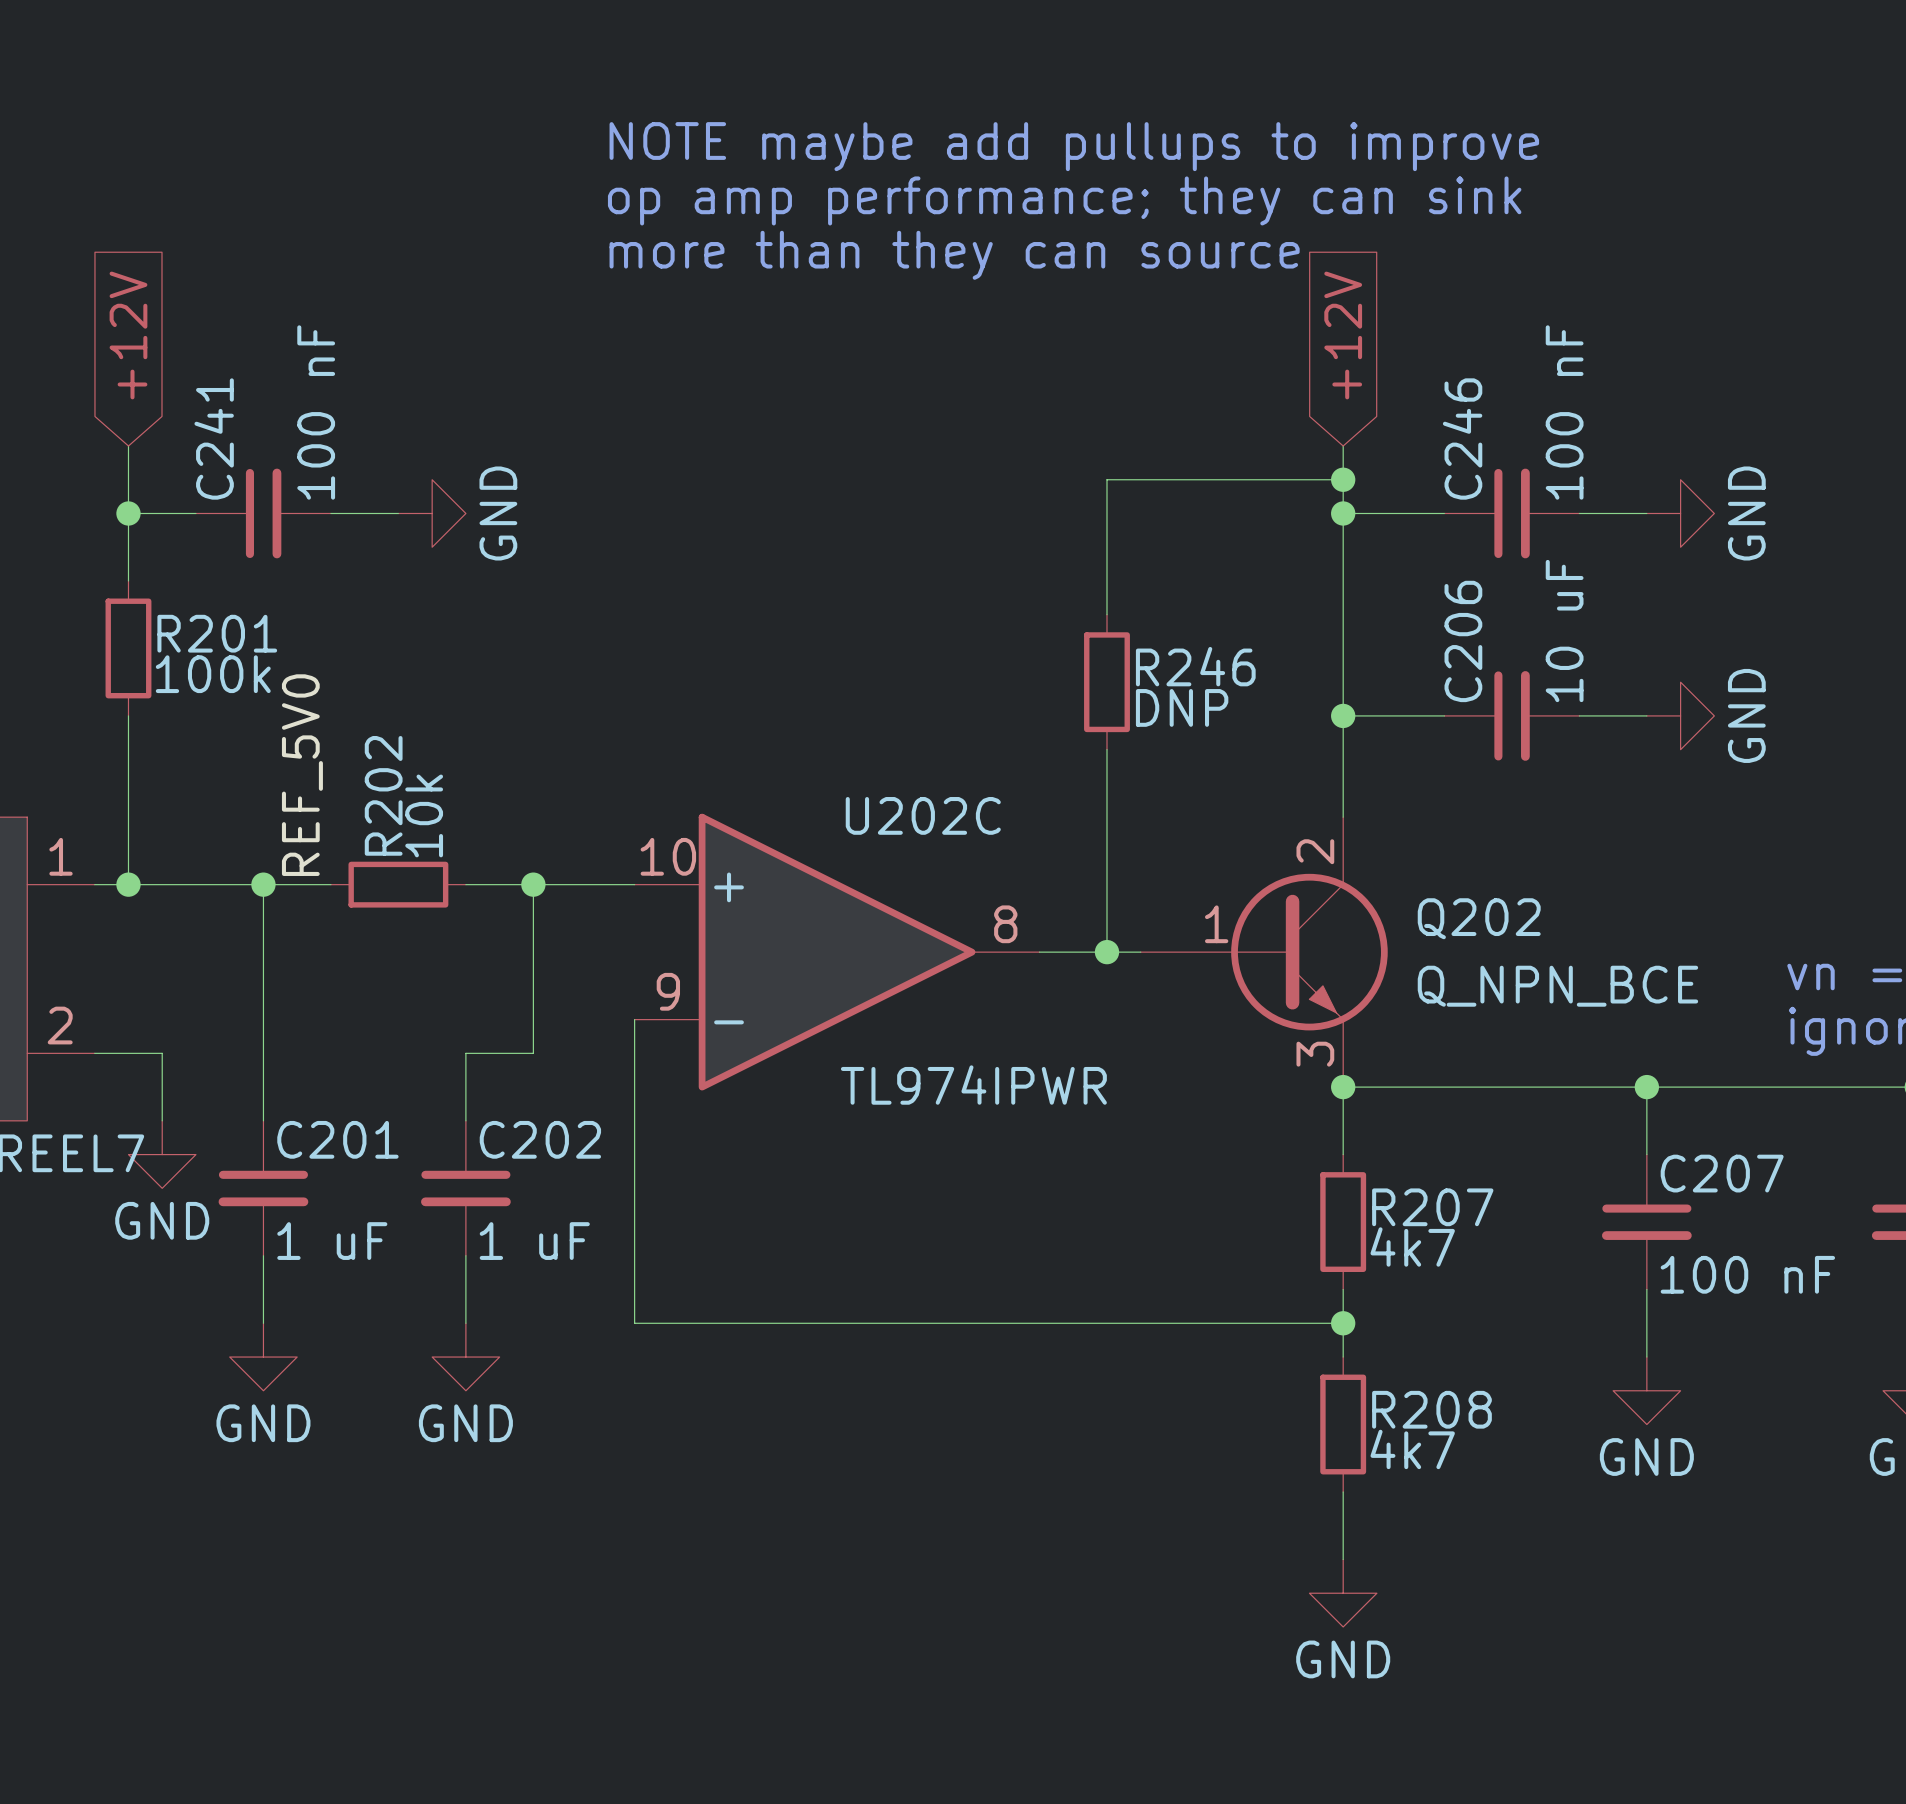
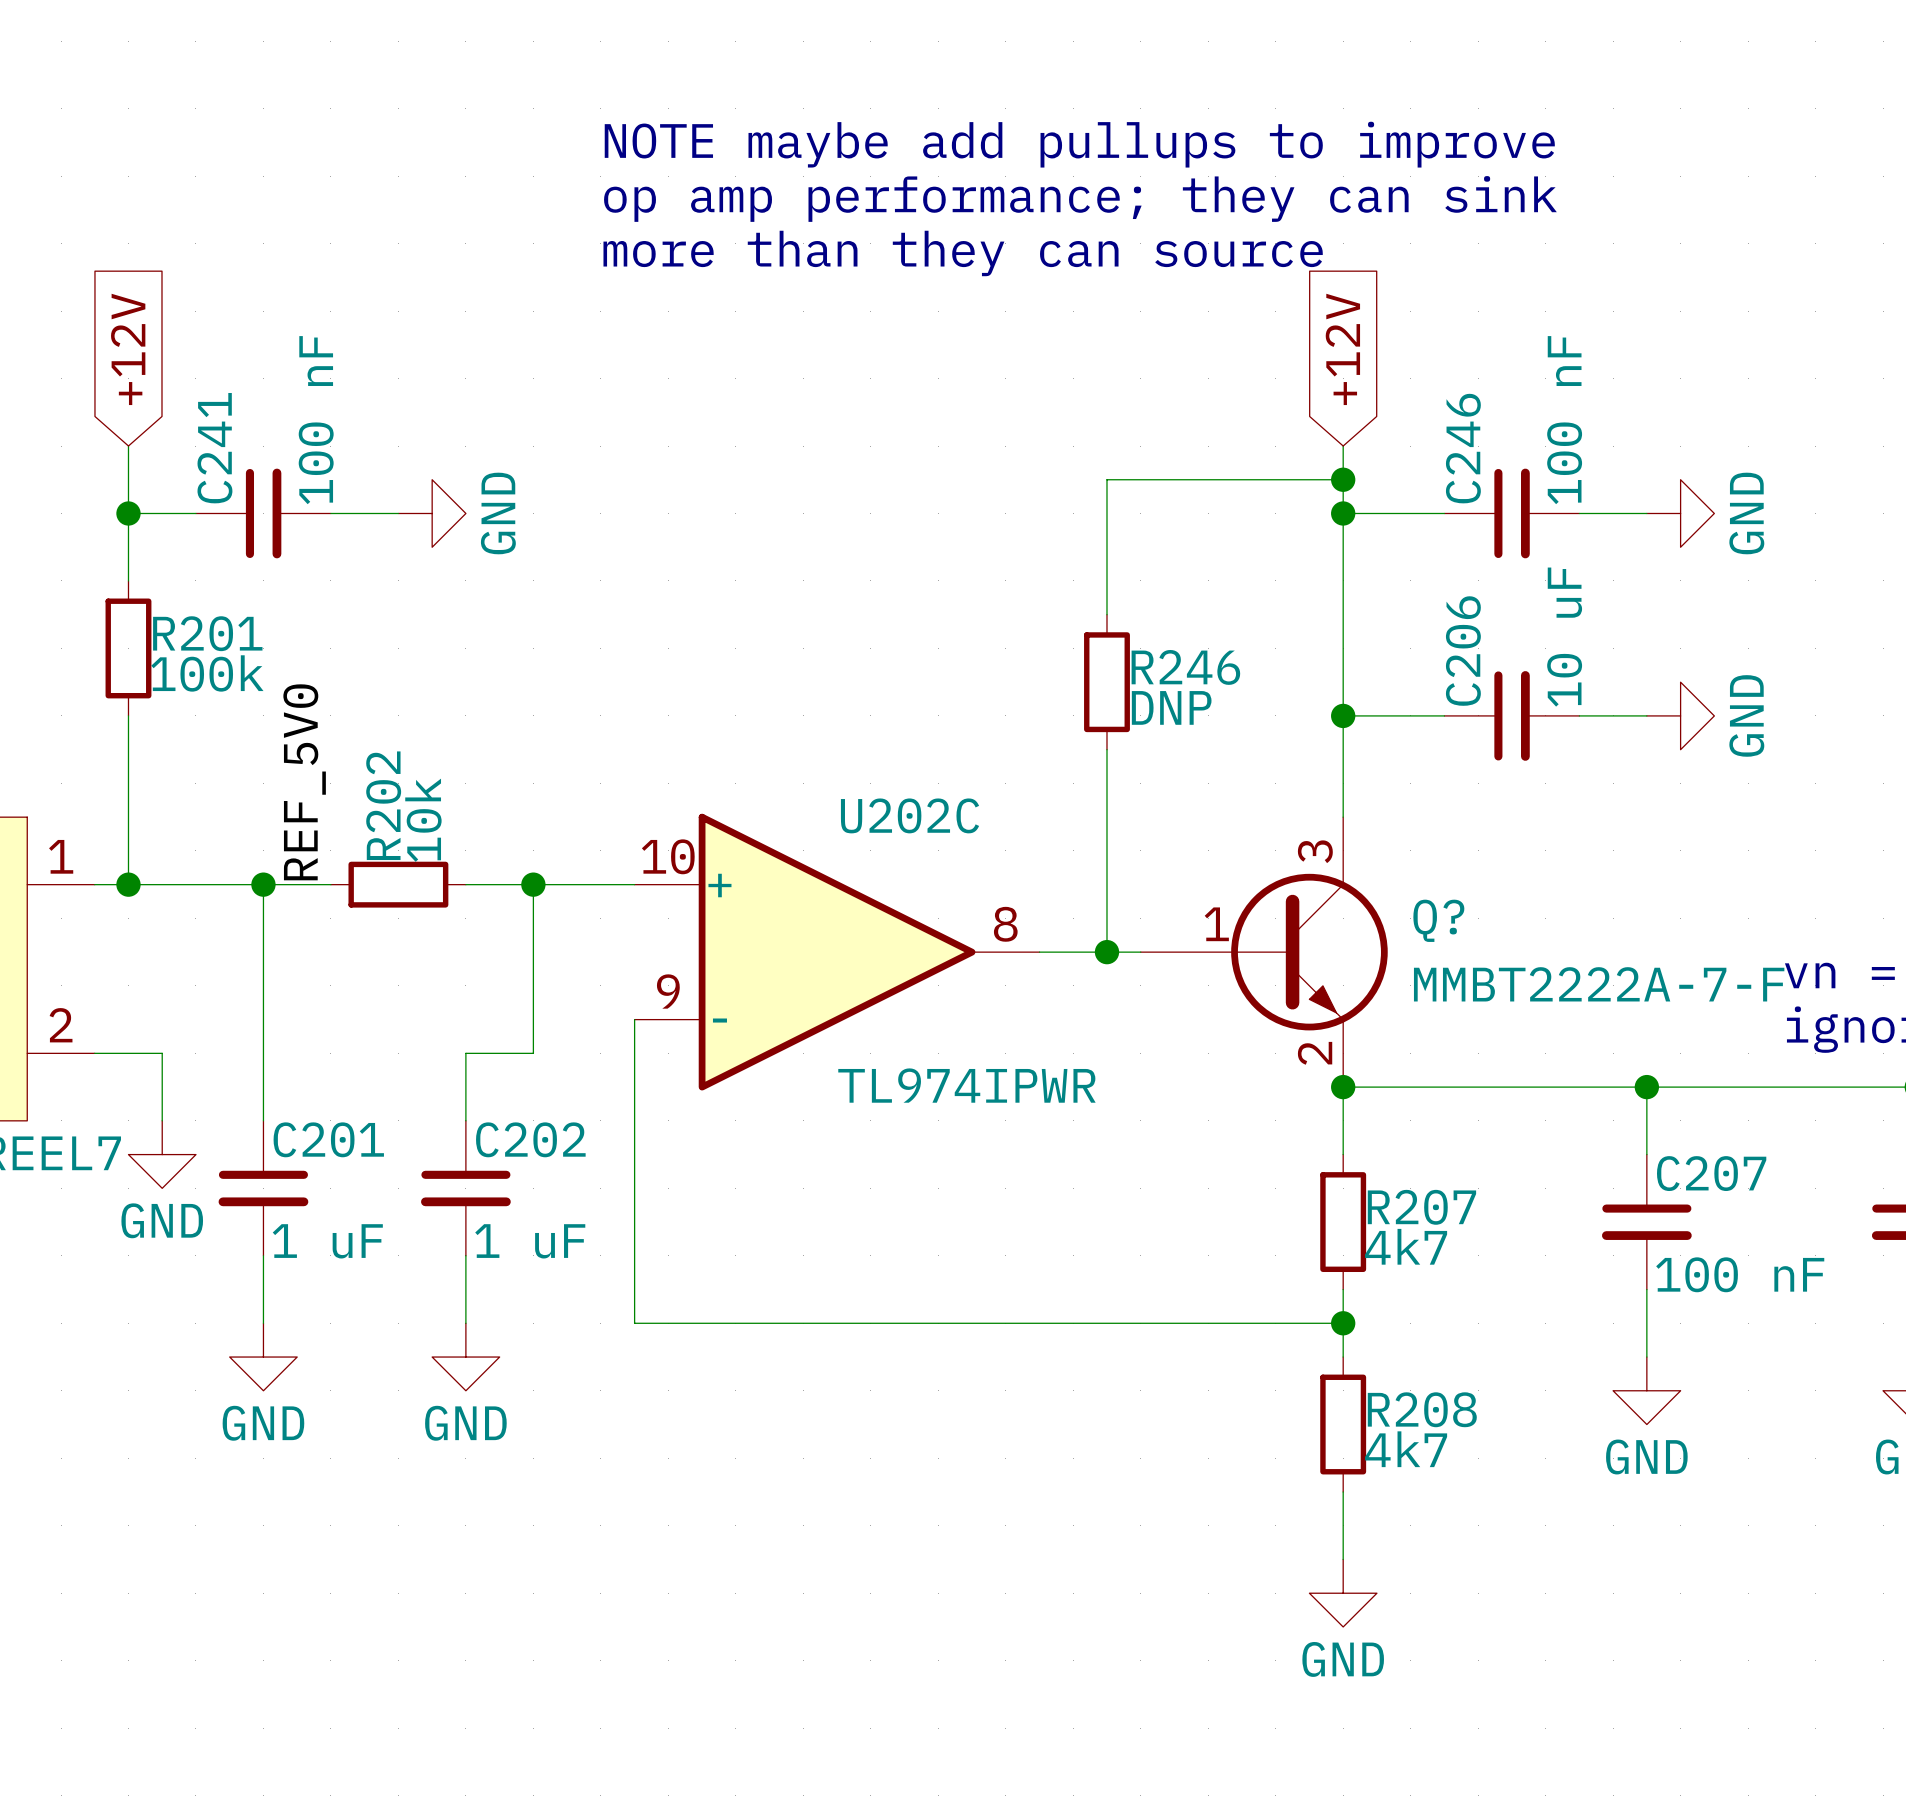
Q202 pin number: 2 (1315, 851) -> 3 (1315, 851)
Q202 name: Q202 (1479, 918) -> Q? (1438, 920)
Q202 value: Q_NPN_BCE (1557, 986) -> MMBT2222A-7-F (1599, 984)
Q202 pin number: 3 (1315, 1054) -> 2 (1315, 1053)

